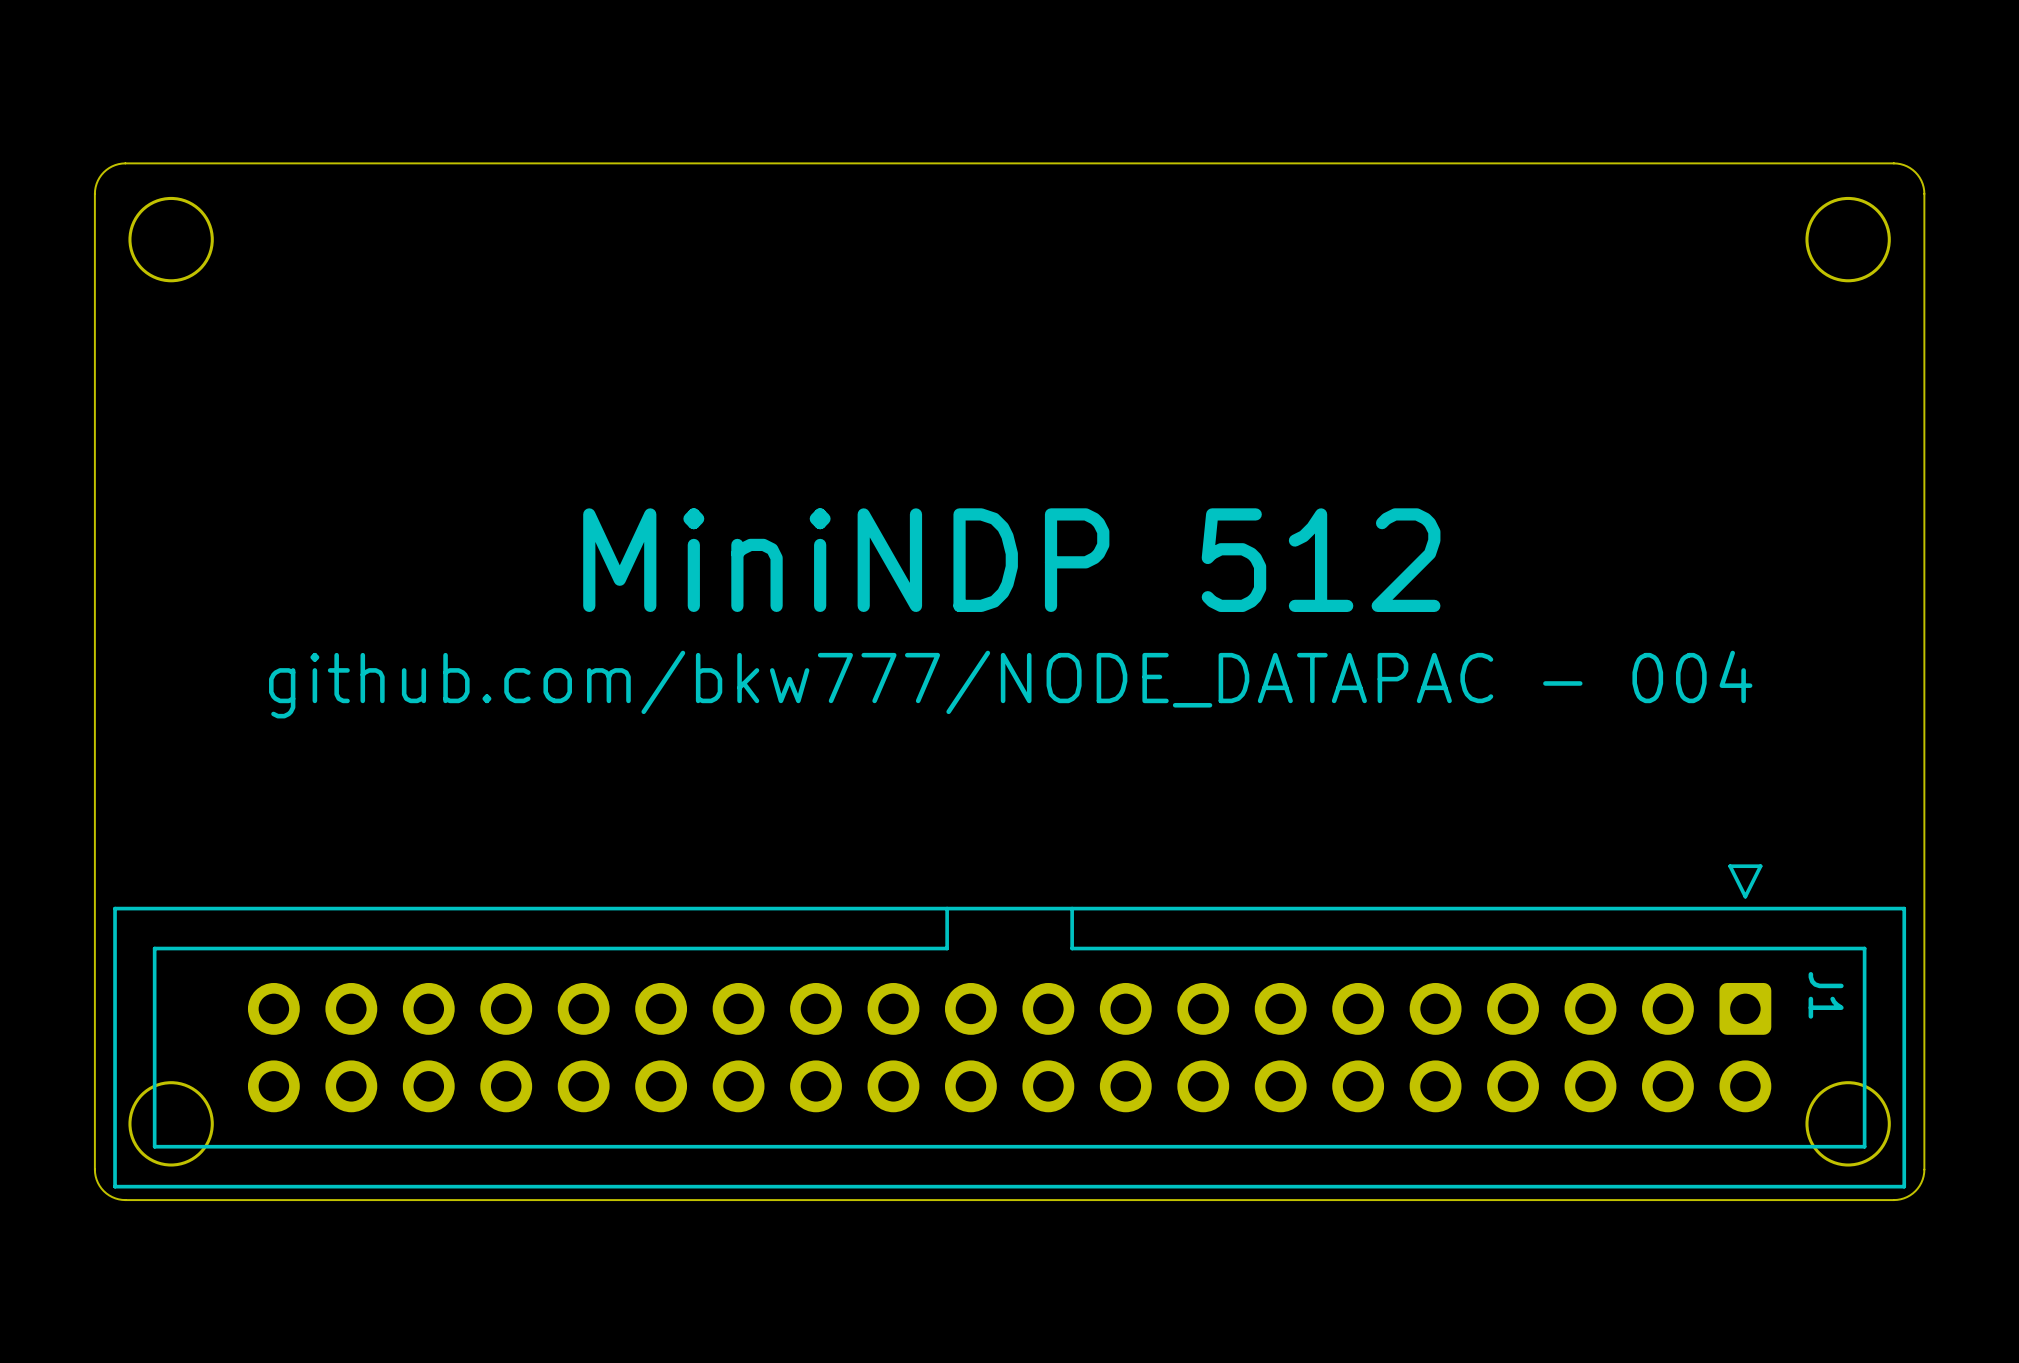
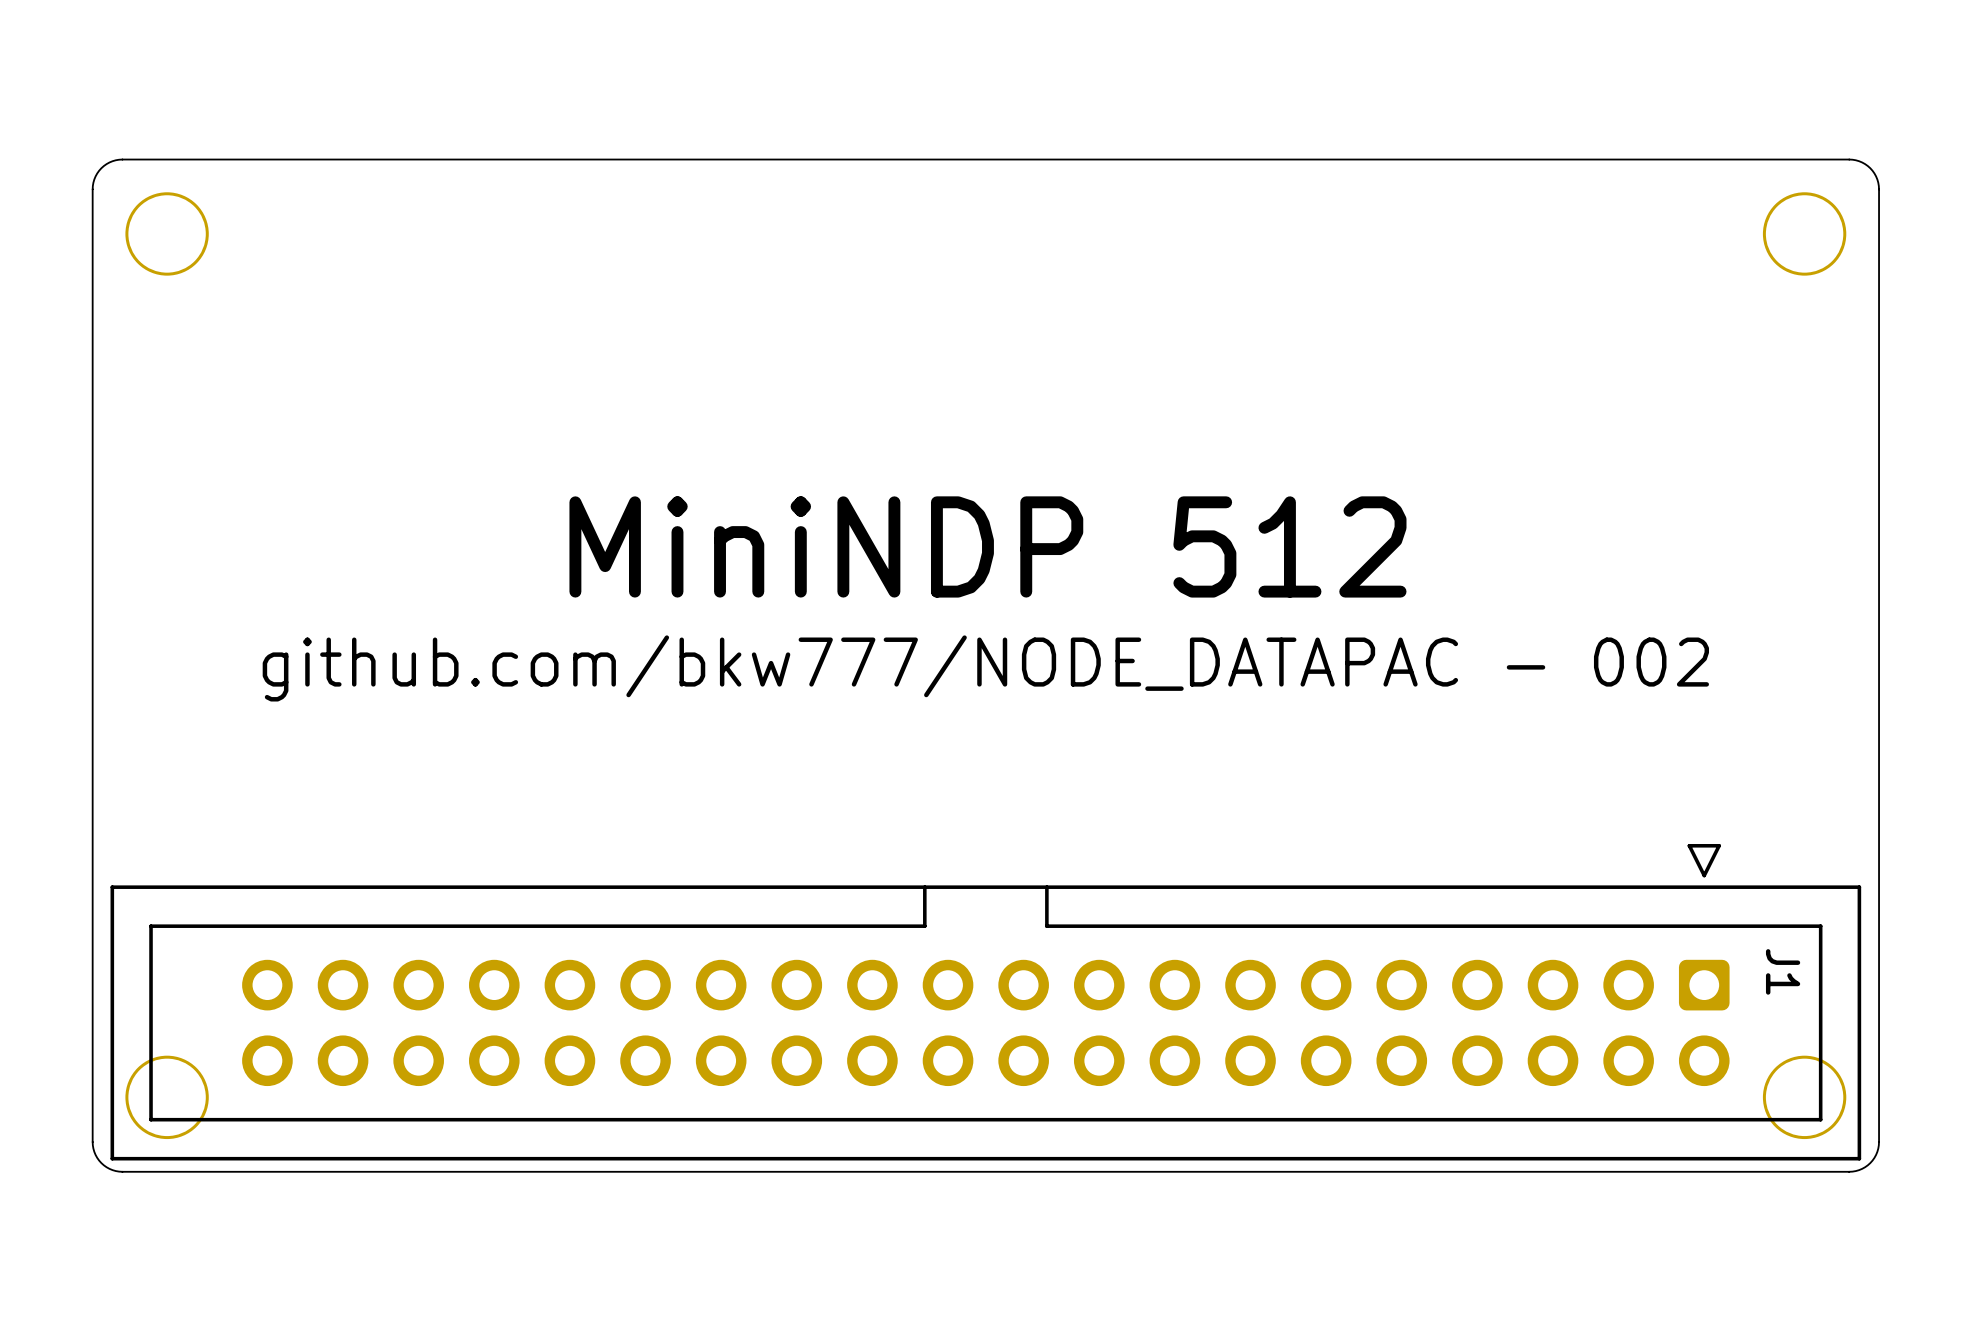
text: github.com/bkw777/NODE_DATAPAC - 004 (1010, 684) -> github.com/bkw777/NODE_DATAPAC - 002 (985, 668)

